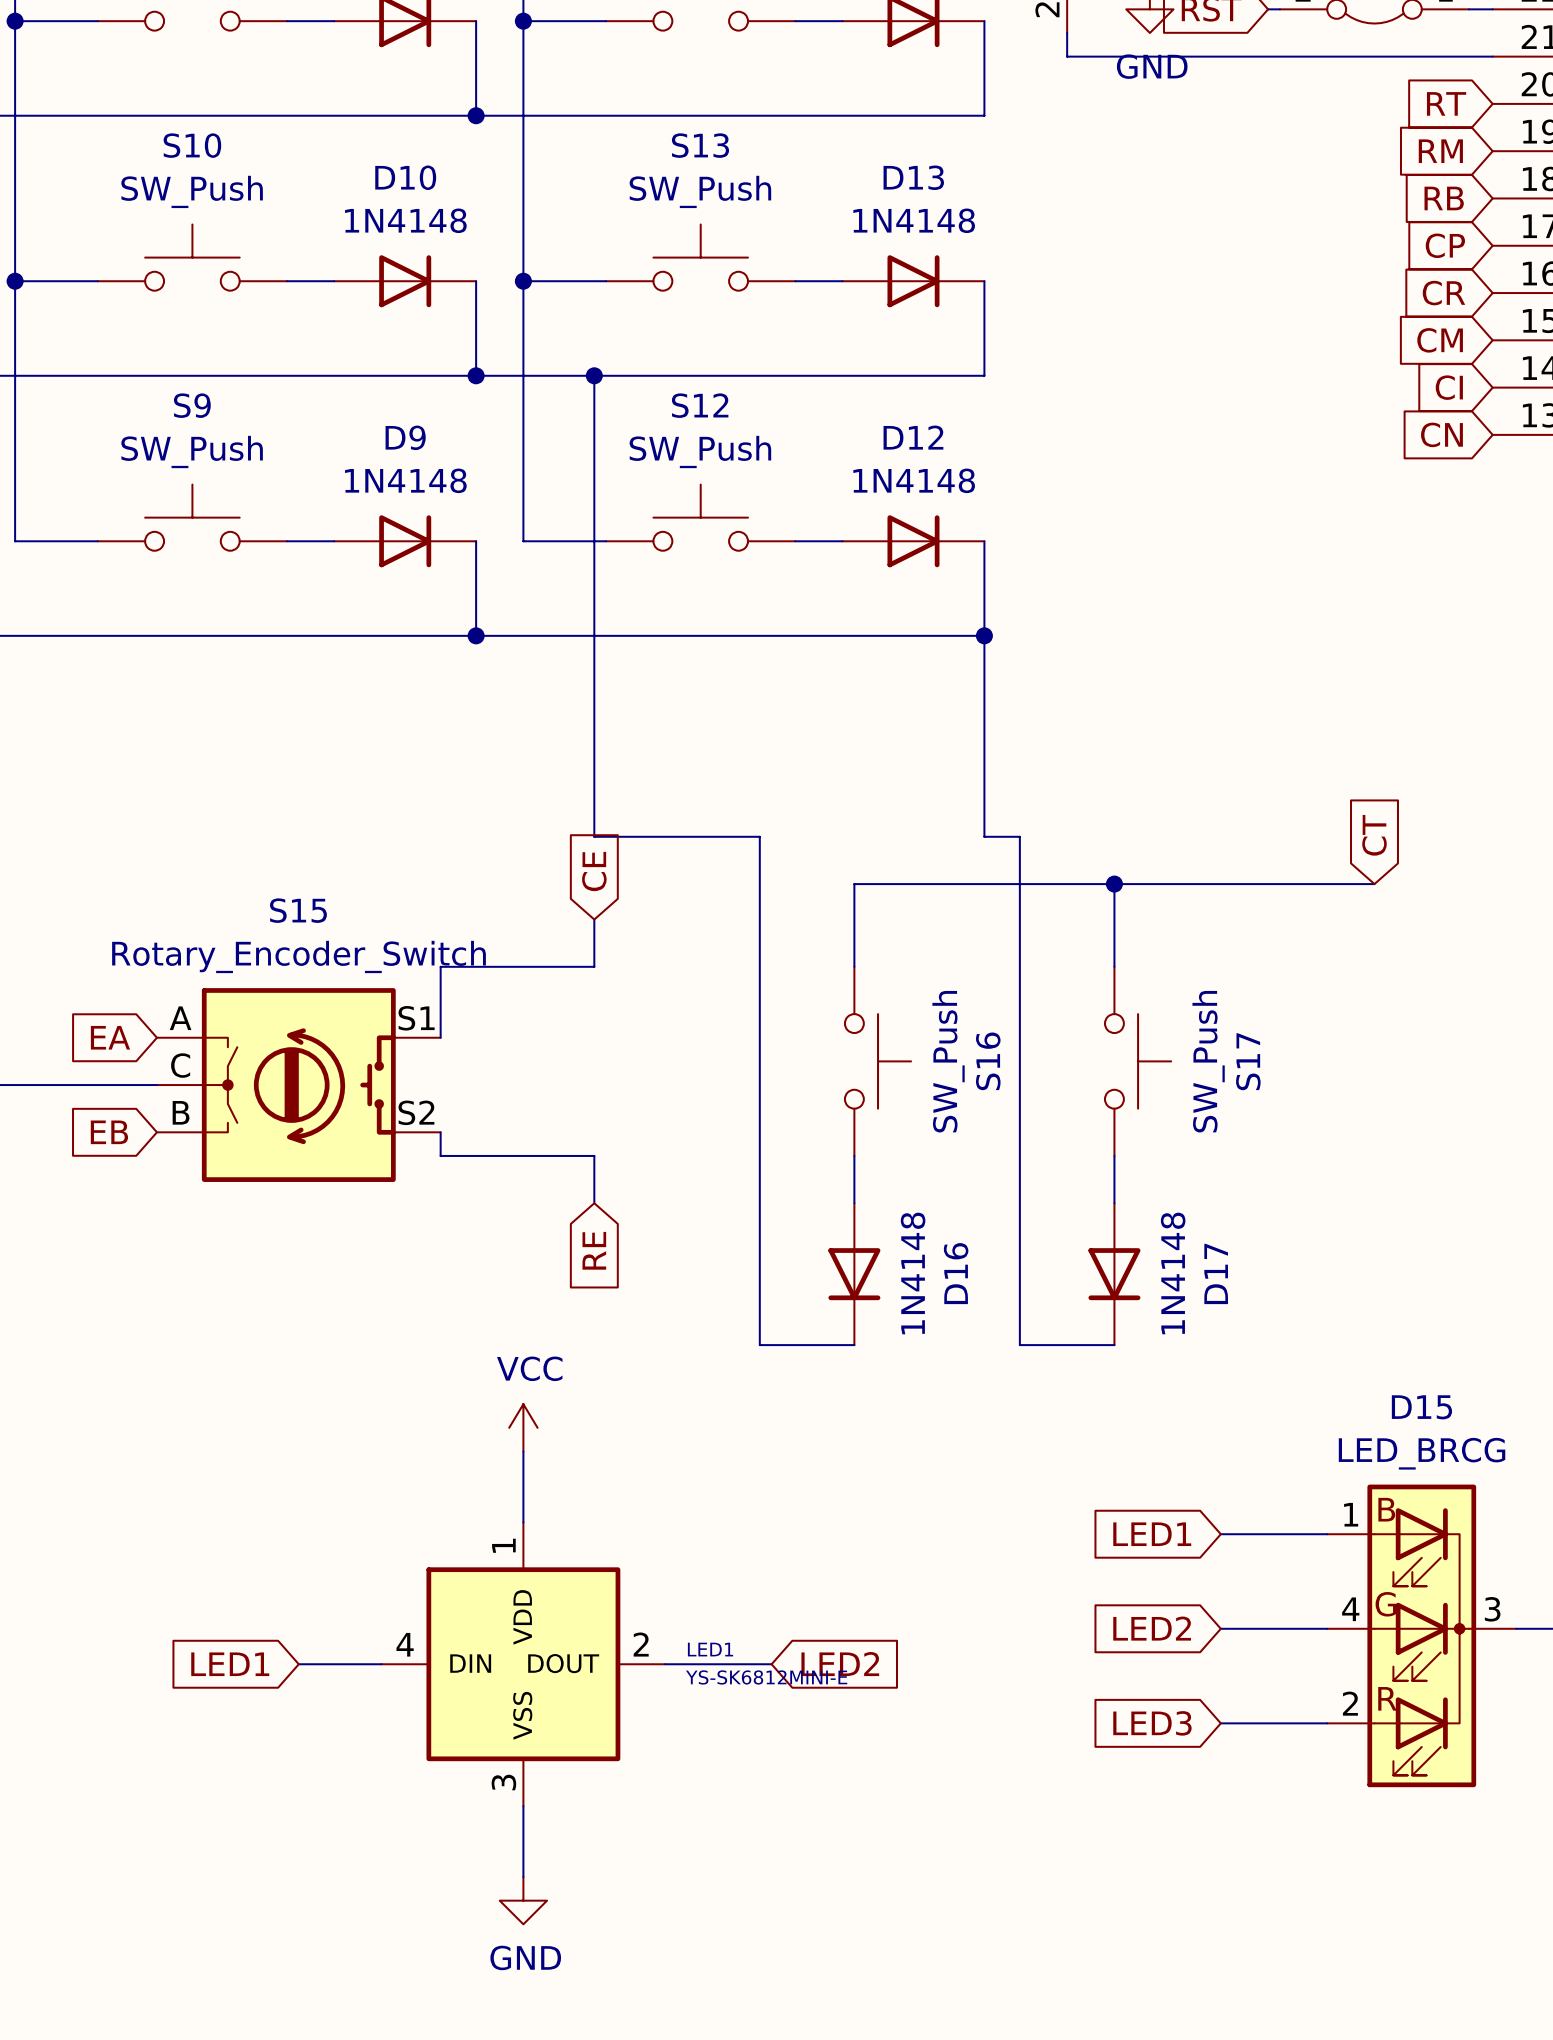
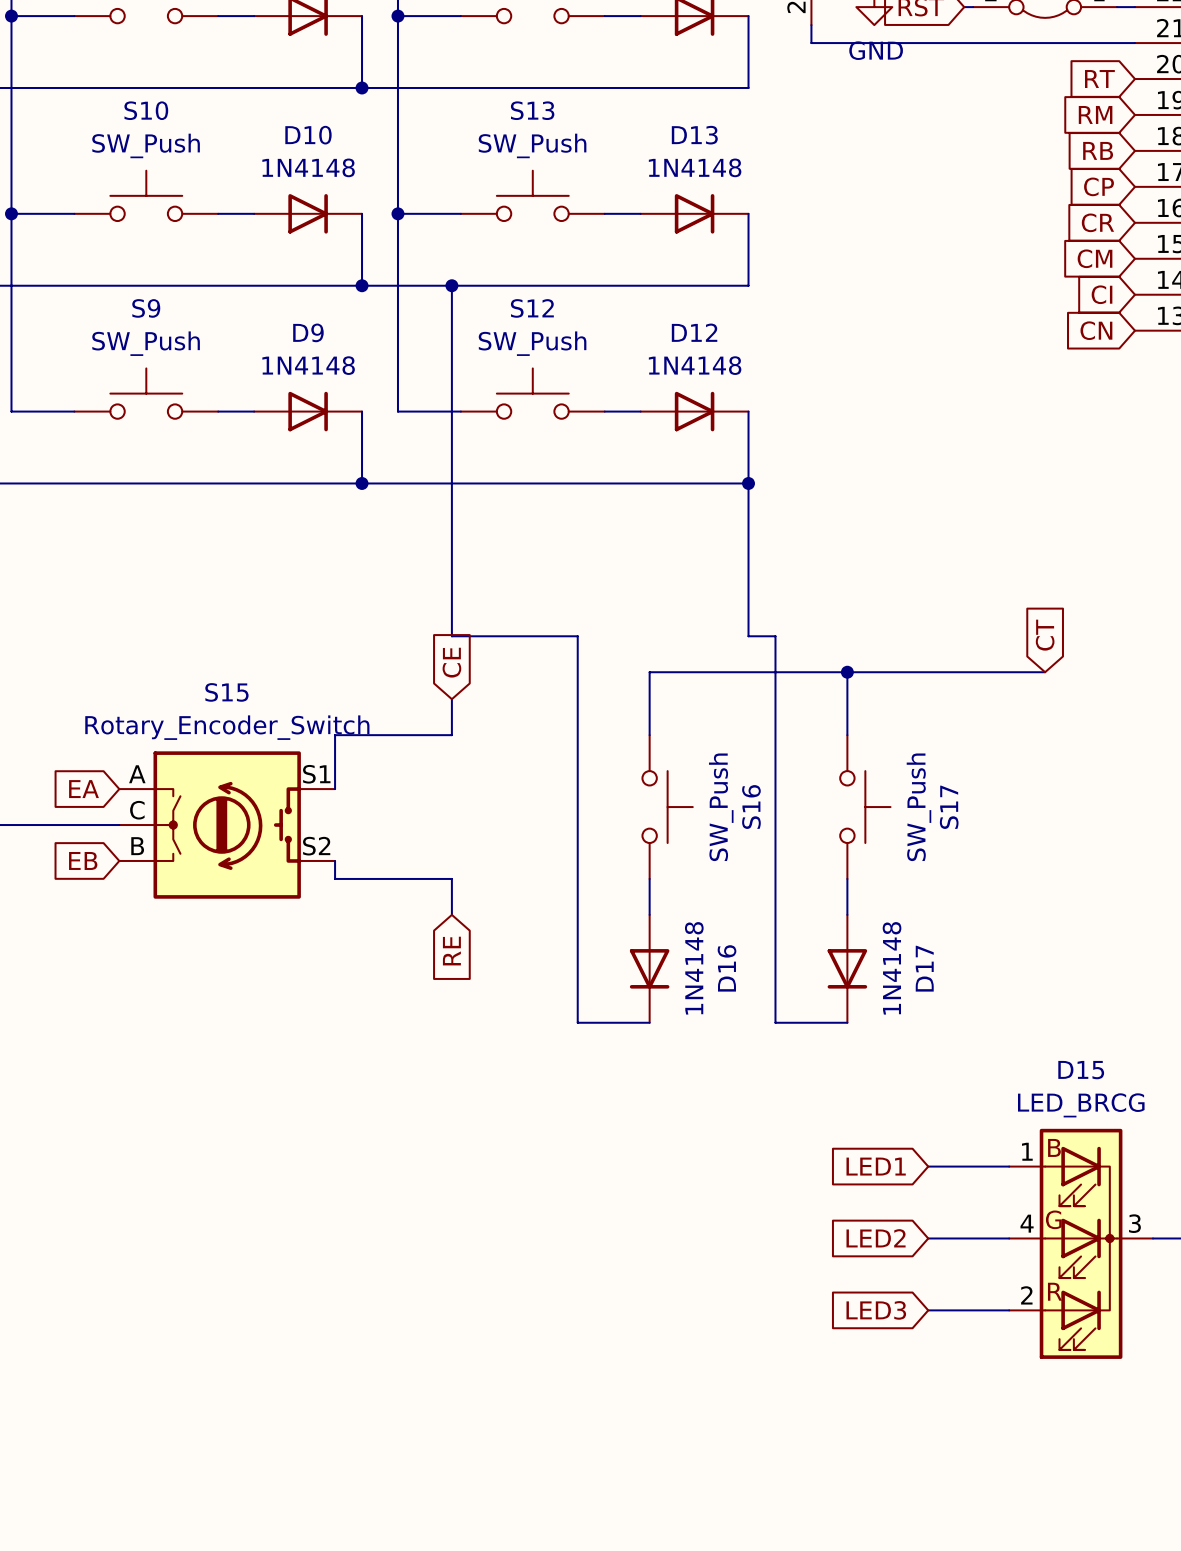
power symbol: VCC (523, 1427) -> none
wire: (523, 1451) (523, 1522) -> none
global label: LED1 (230, 1664) -> none
wire: (298, 1664) (381, 1664) -> none
LED1: YS-SK6812MINI-E (523, 1664) -> none
wire: (665, 1664) (771, 1664) -> none
global label: LED2 (840, 1664) -> none
wire: (523, 1806) (523, 1877) -> none
power symbol: GND (523, 1900) -> none

